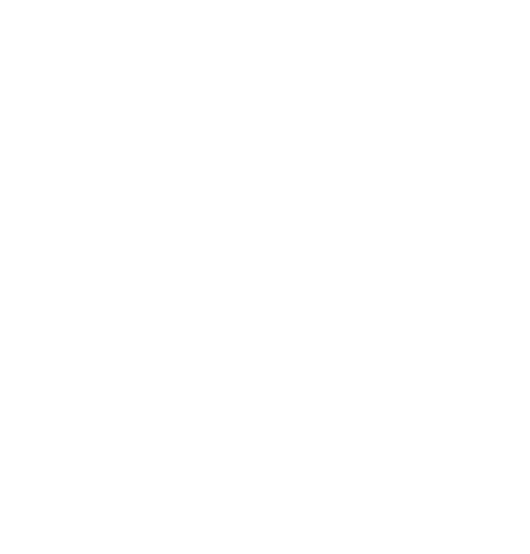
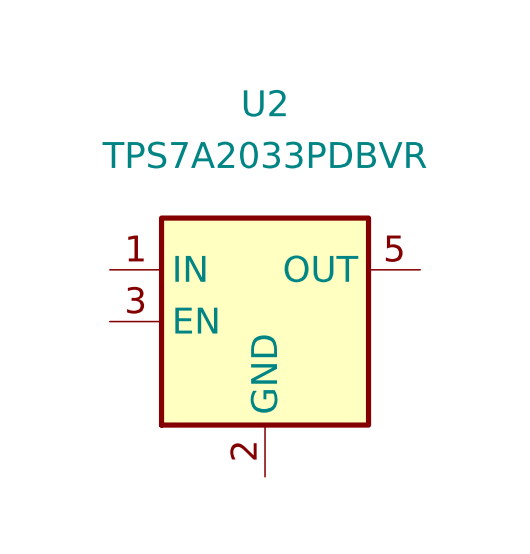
U2: none -> TPS7A2033PDBVR (265, 346)

